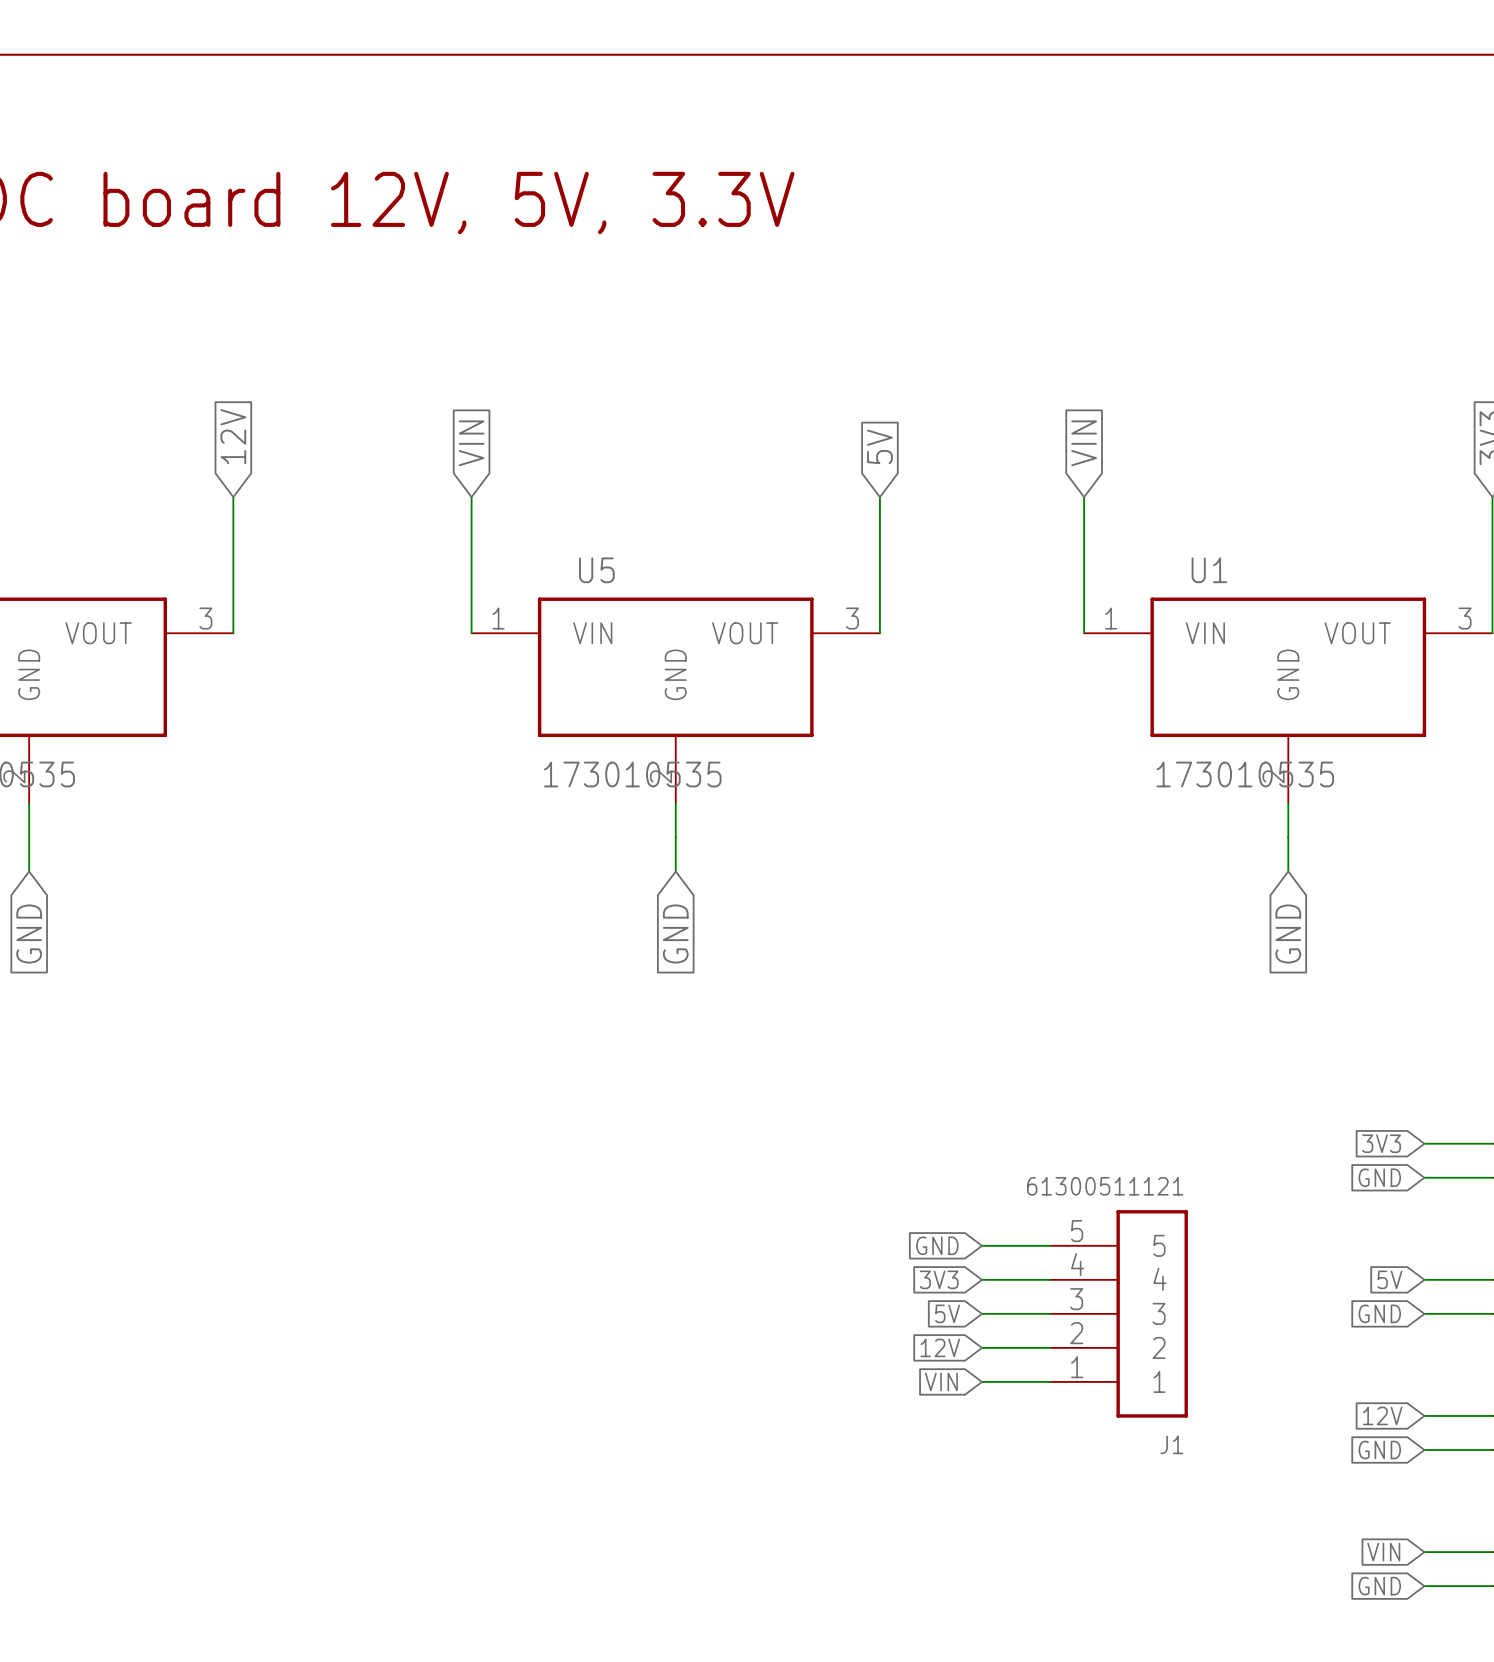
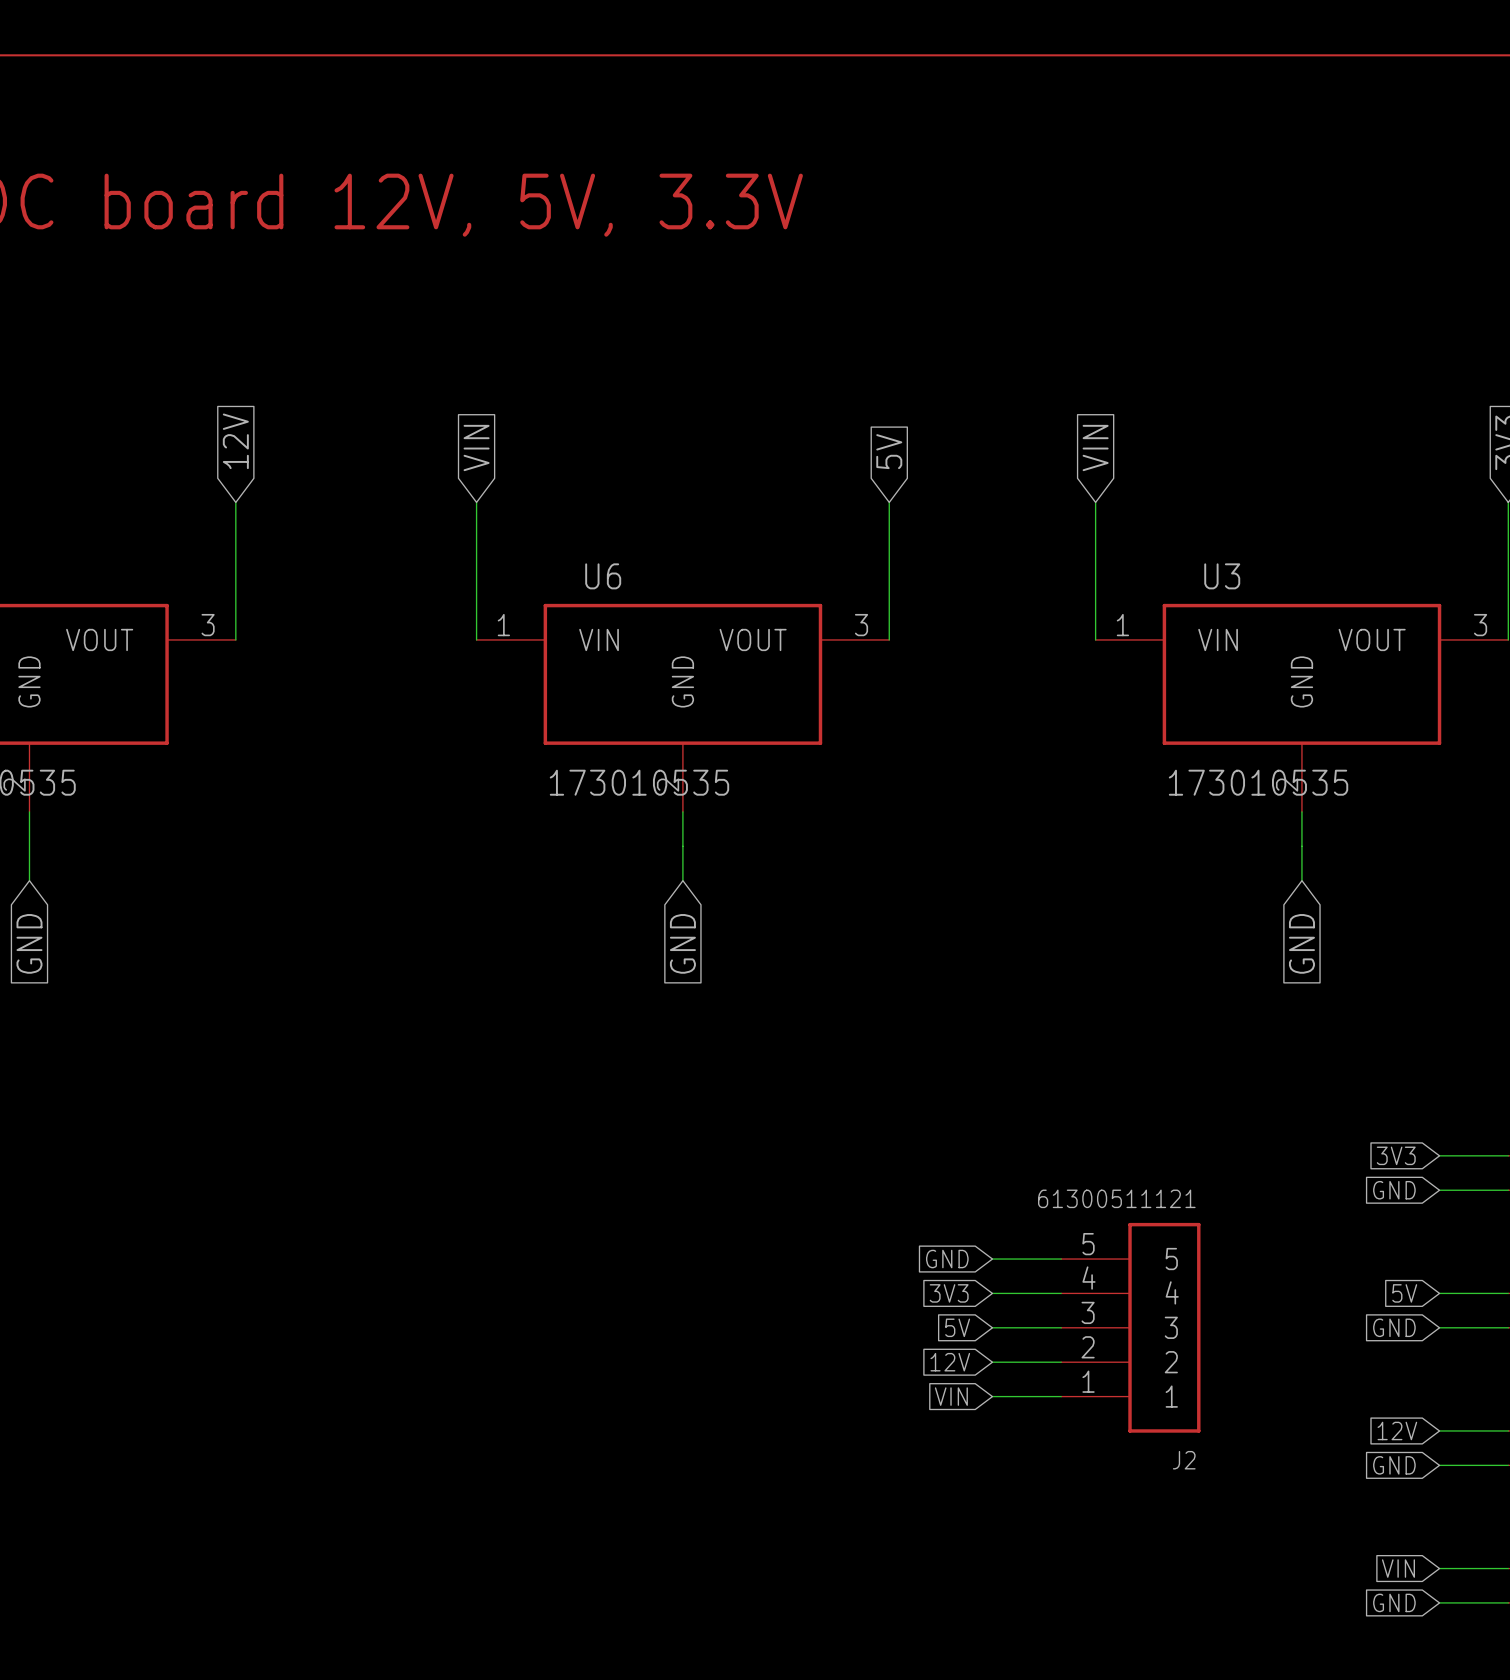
U5 name: U5 (596, 570) -> U6 (603, 576)
U1 name: U1 (1209, 570) -> U3 (1222, 576)
J1 name: J1 (1171, 1444) -> J2 (1184, 1460)

